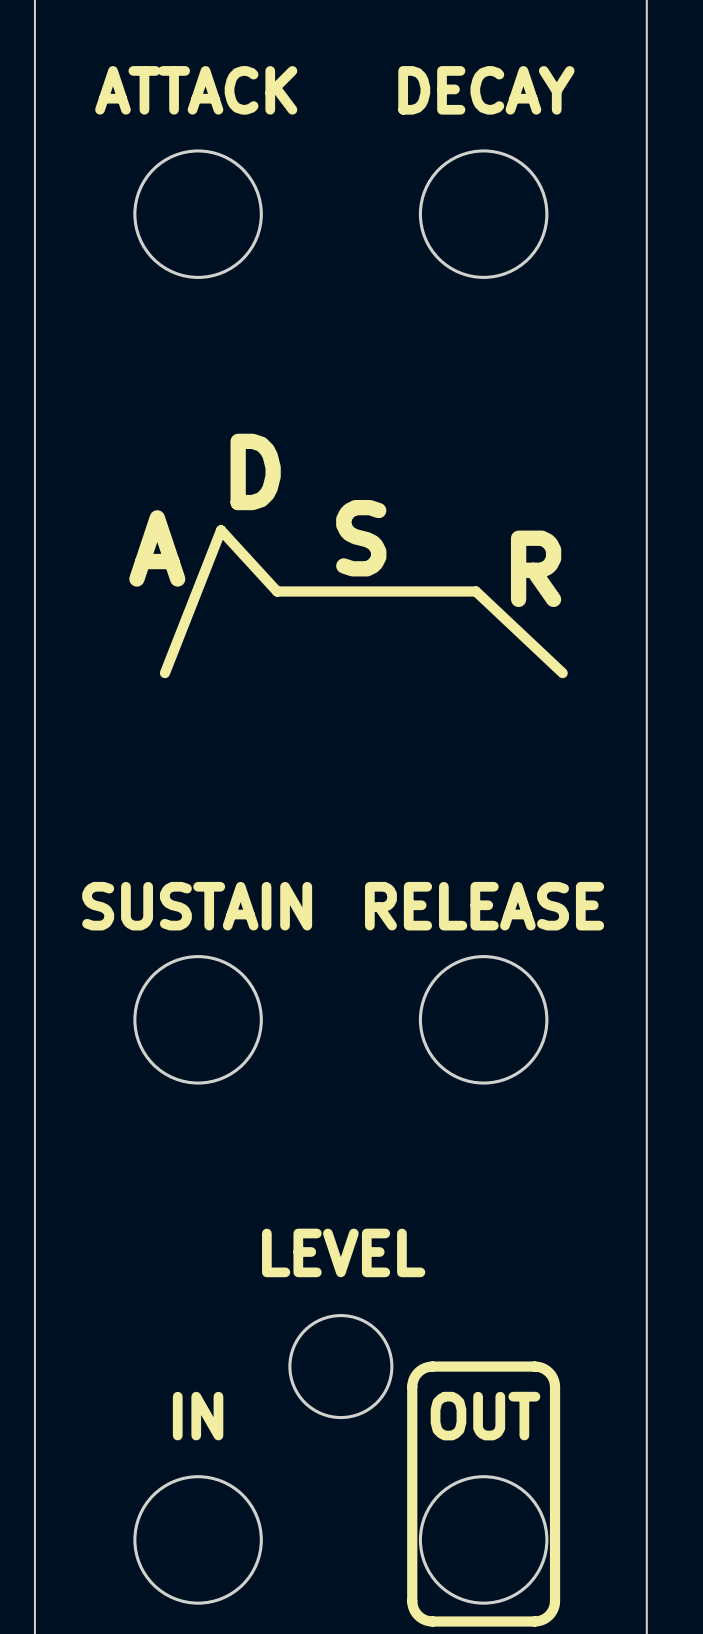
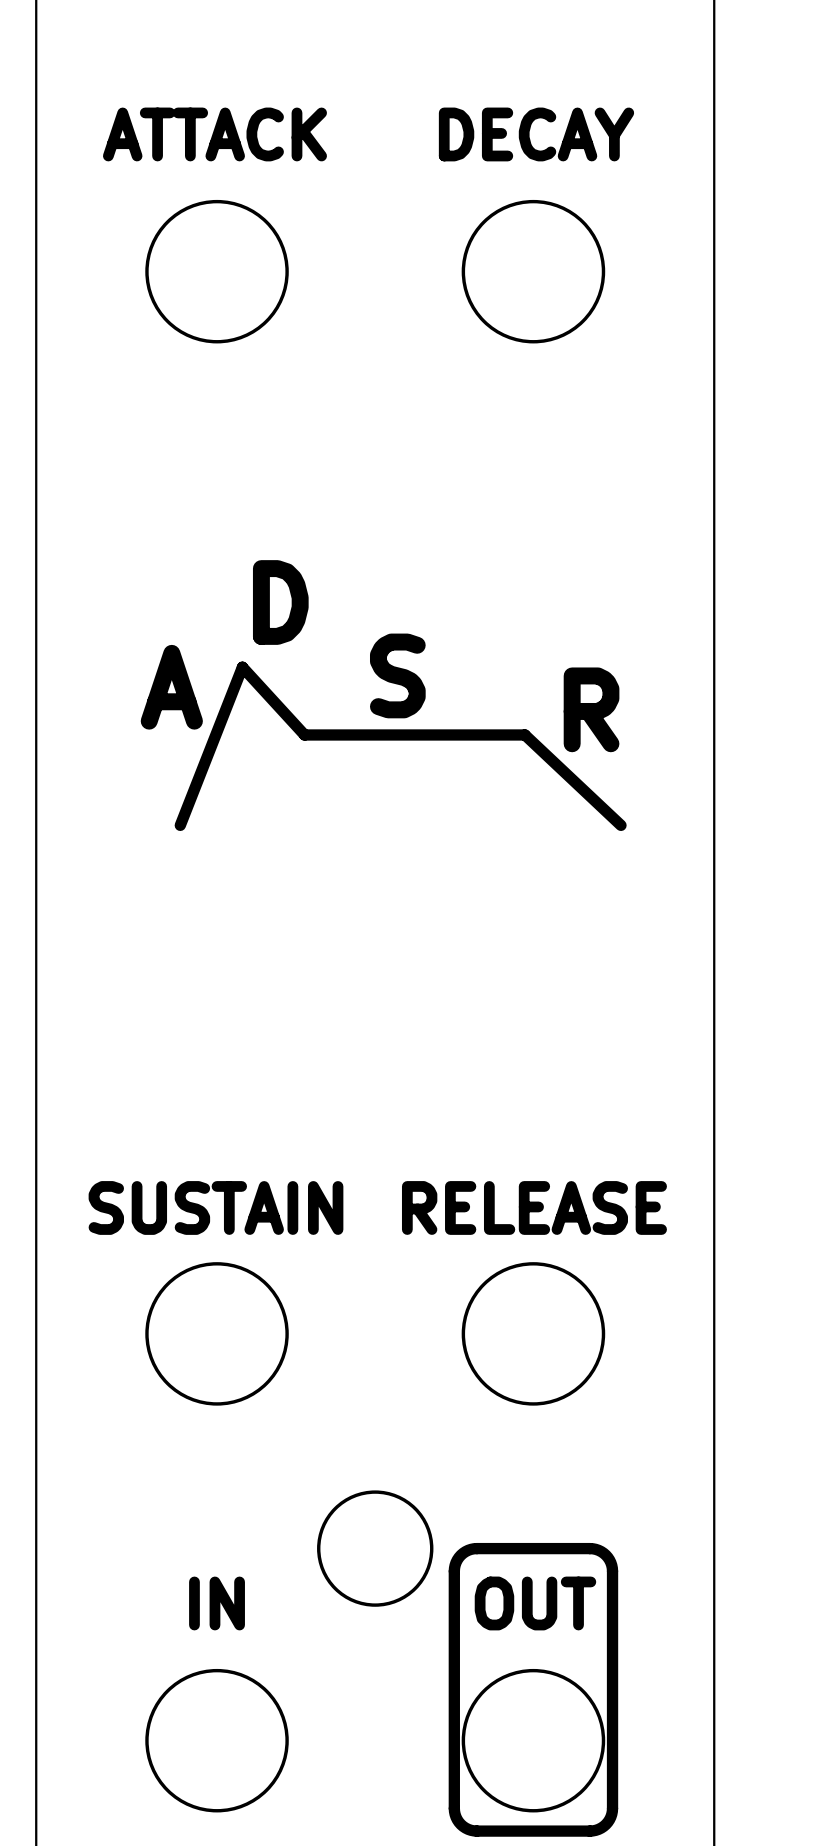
text position: D (255, 471) -> D (280, 602)
text position: S (361, 538) -> S (397, 675)
text position: A (157, 548) -> A (171, 687)
text position: R (536, 568) -> R (591, 709)
line: (164, 673) (221, 530) (277, 591) (476, 591) (562, 673) -> (180, 825) (242, 667) (304, 734) (524, 734) (621, 825)
text position: SUSTAIN (197, 906) -> SUSTAIN (216, 1207)
text position: RELEASE (484, 906) -> RELEASE (534, 1207)
round board edge position: (198, 1019) -> (217, 1333)
round board edge position: (483, 1019) -> (533, 1333)
text: LEVEL (343, 1252) -> none

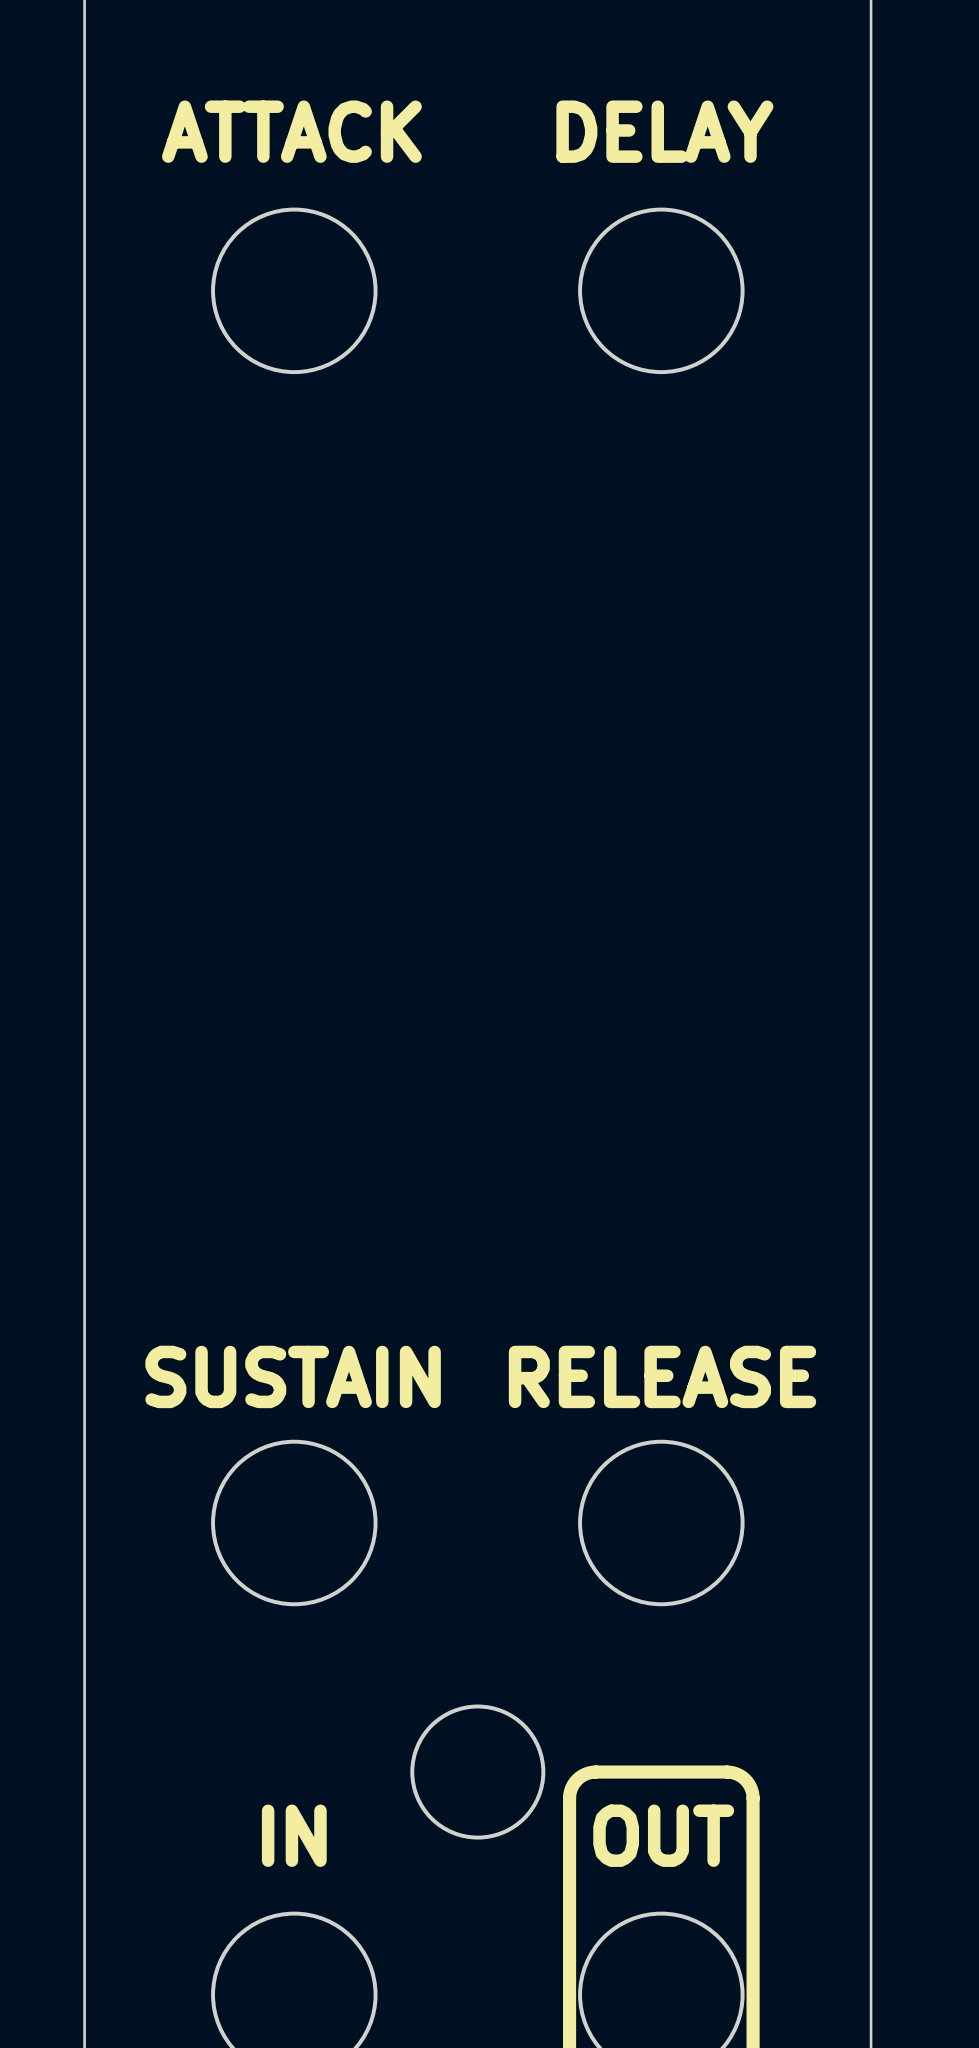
text: DECAY (536, 134) -> DELAY (664, 131)
text: D (280, 602) -> none
text: S (397, 675) -> none
text: A (171, 687) -> none
text: R (591, 709) -> none
line: (180, 825) (242, 667) (304, 734) (524, 734) (621, 825) -> none

